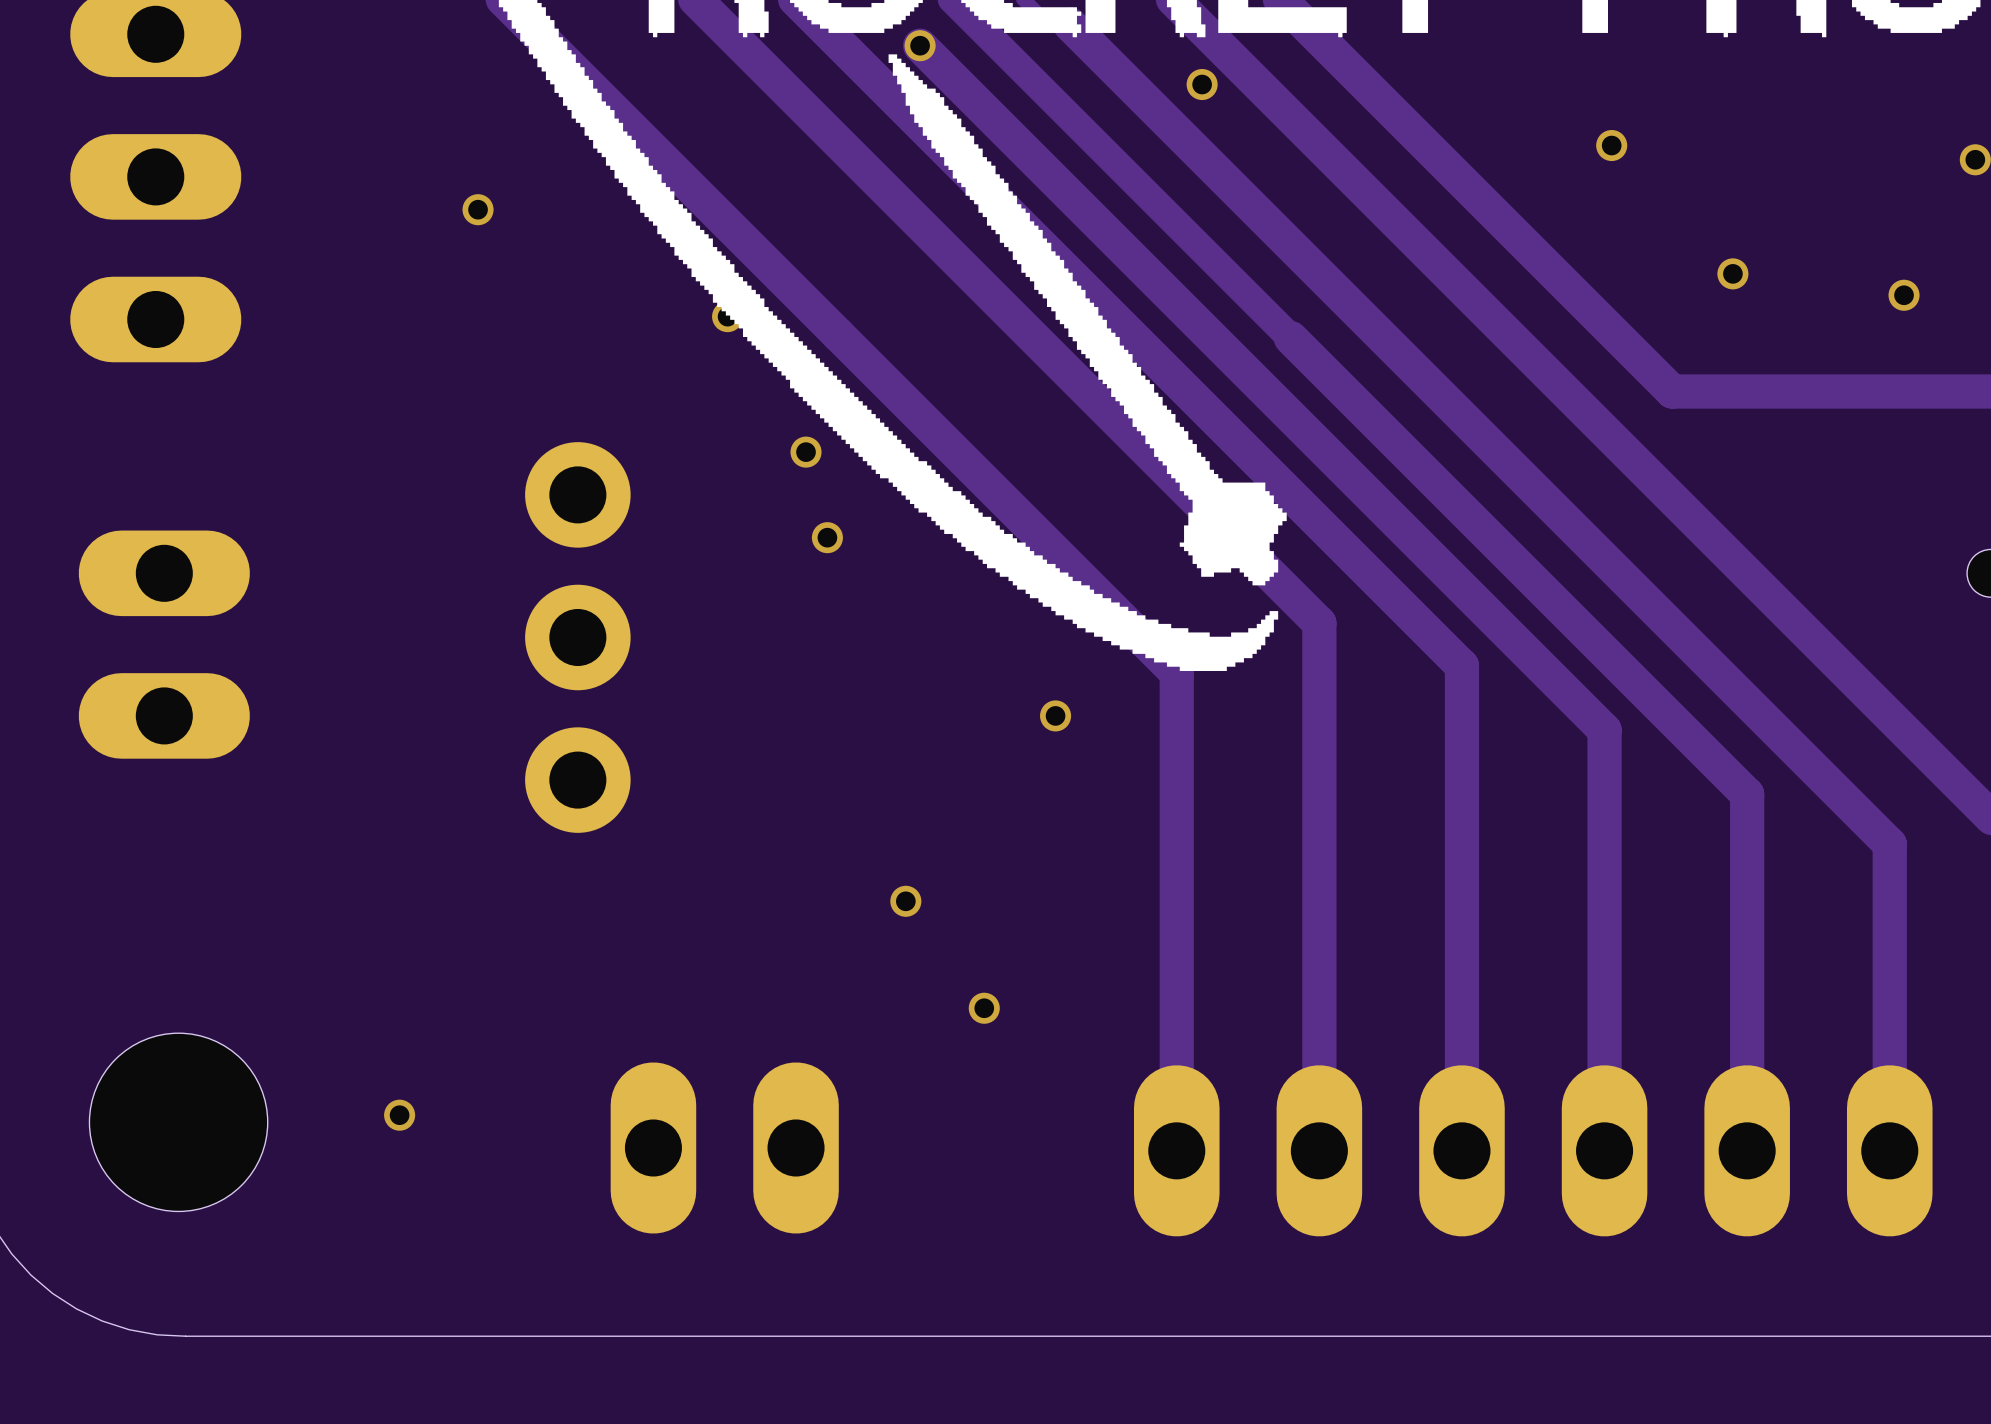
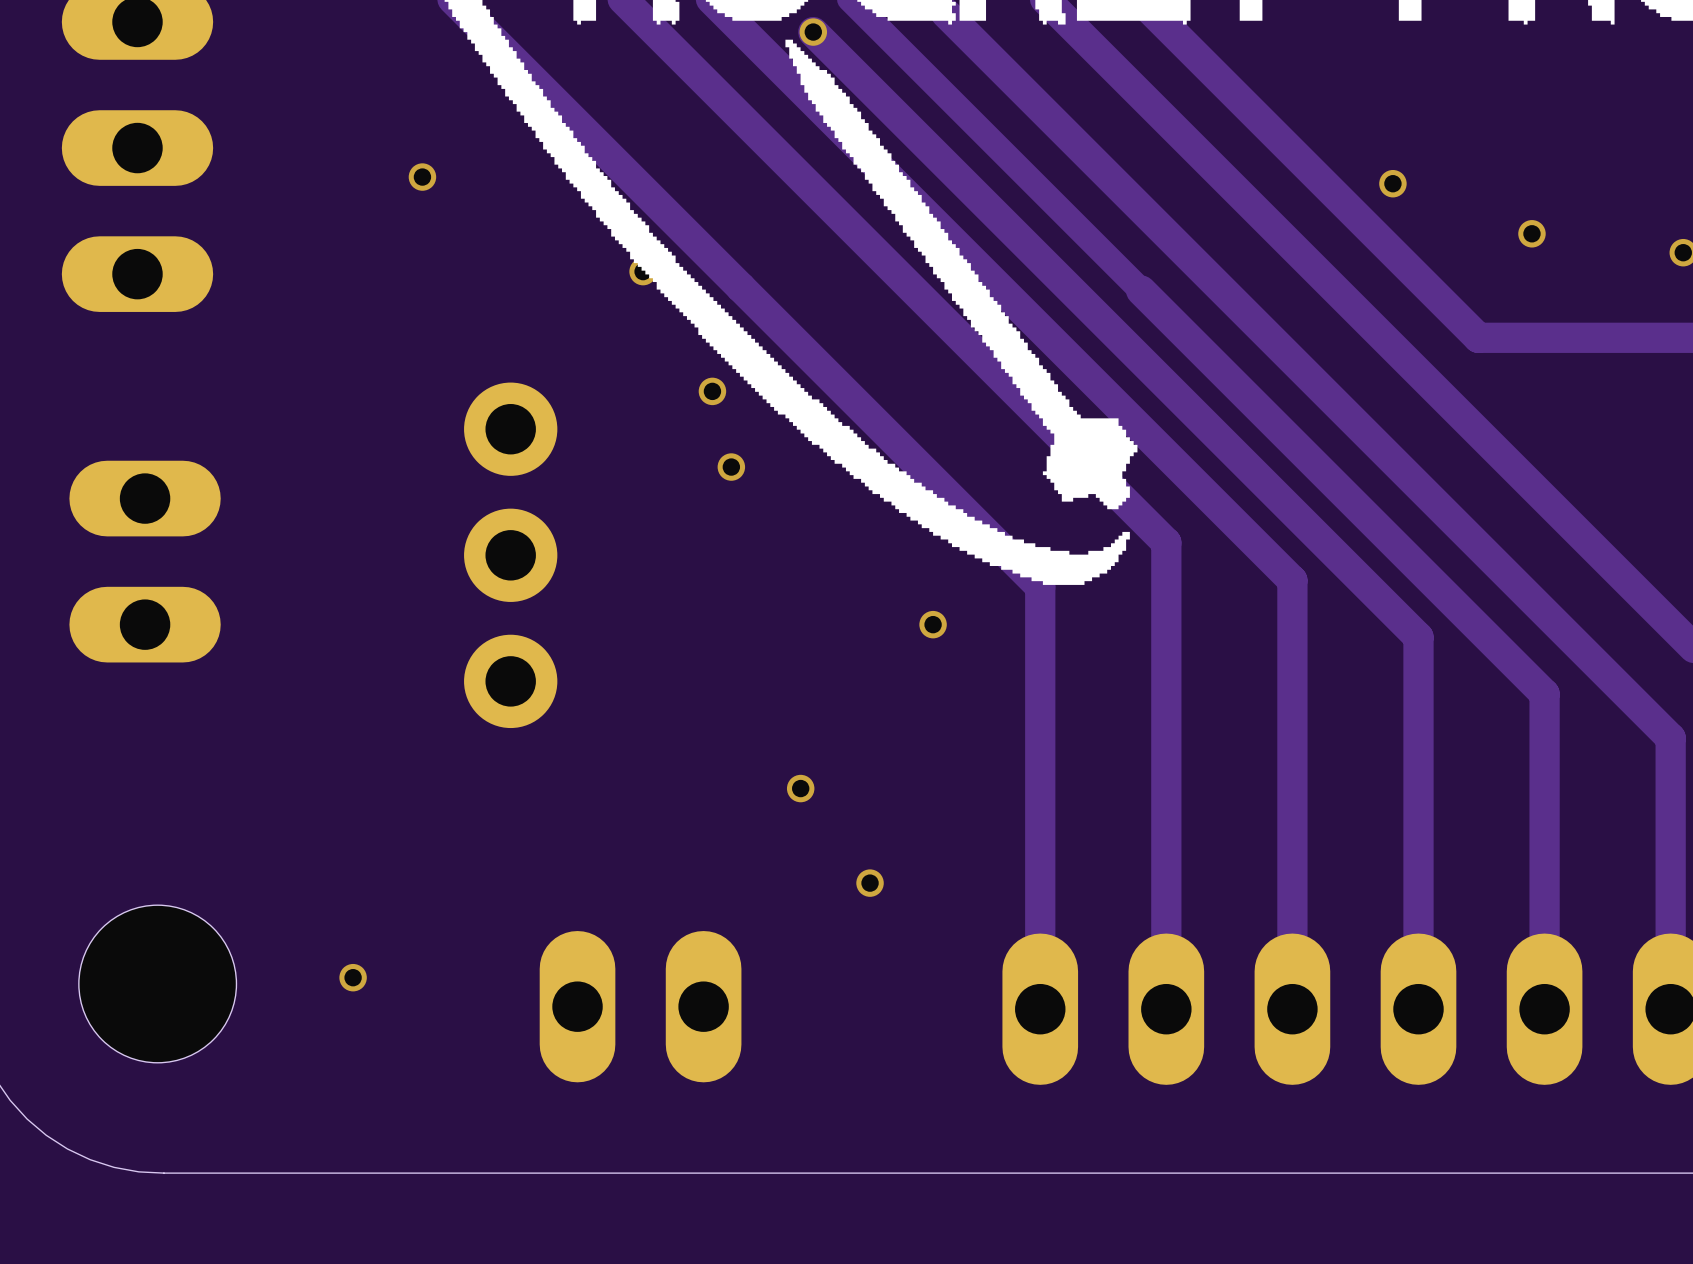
via: (1202, 84) -> none
via position: (1611, 145) -> (1392, 183)

